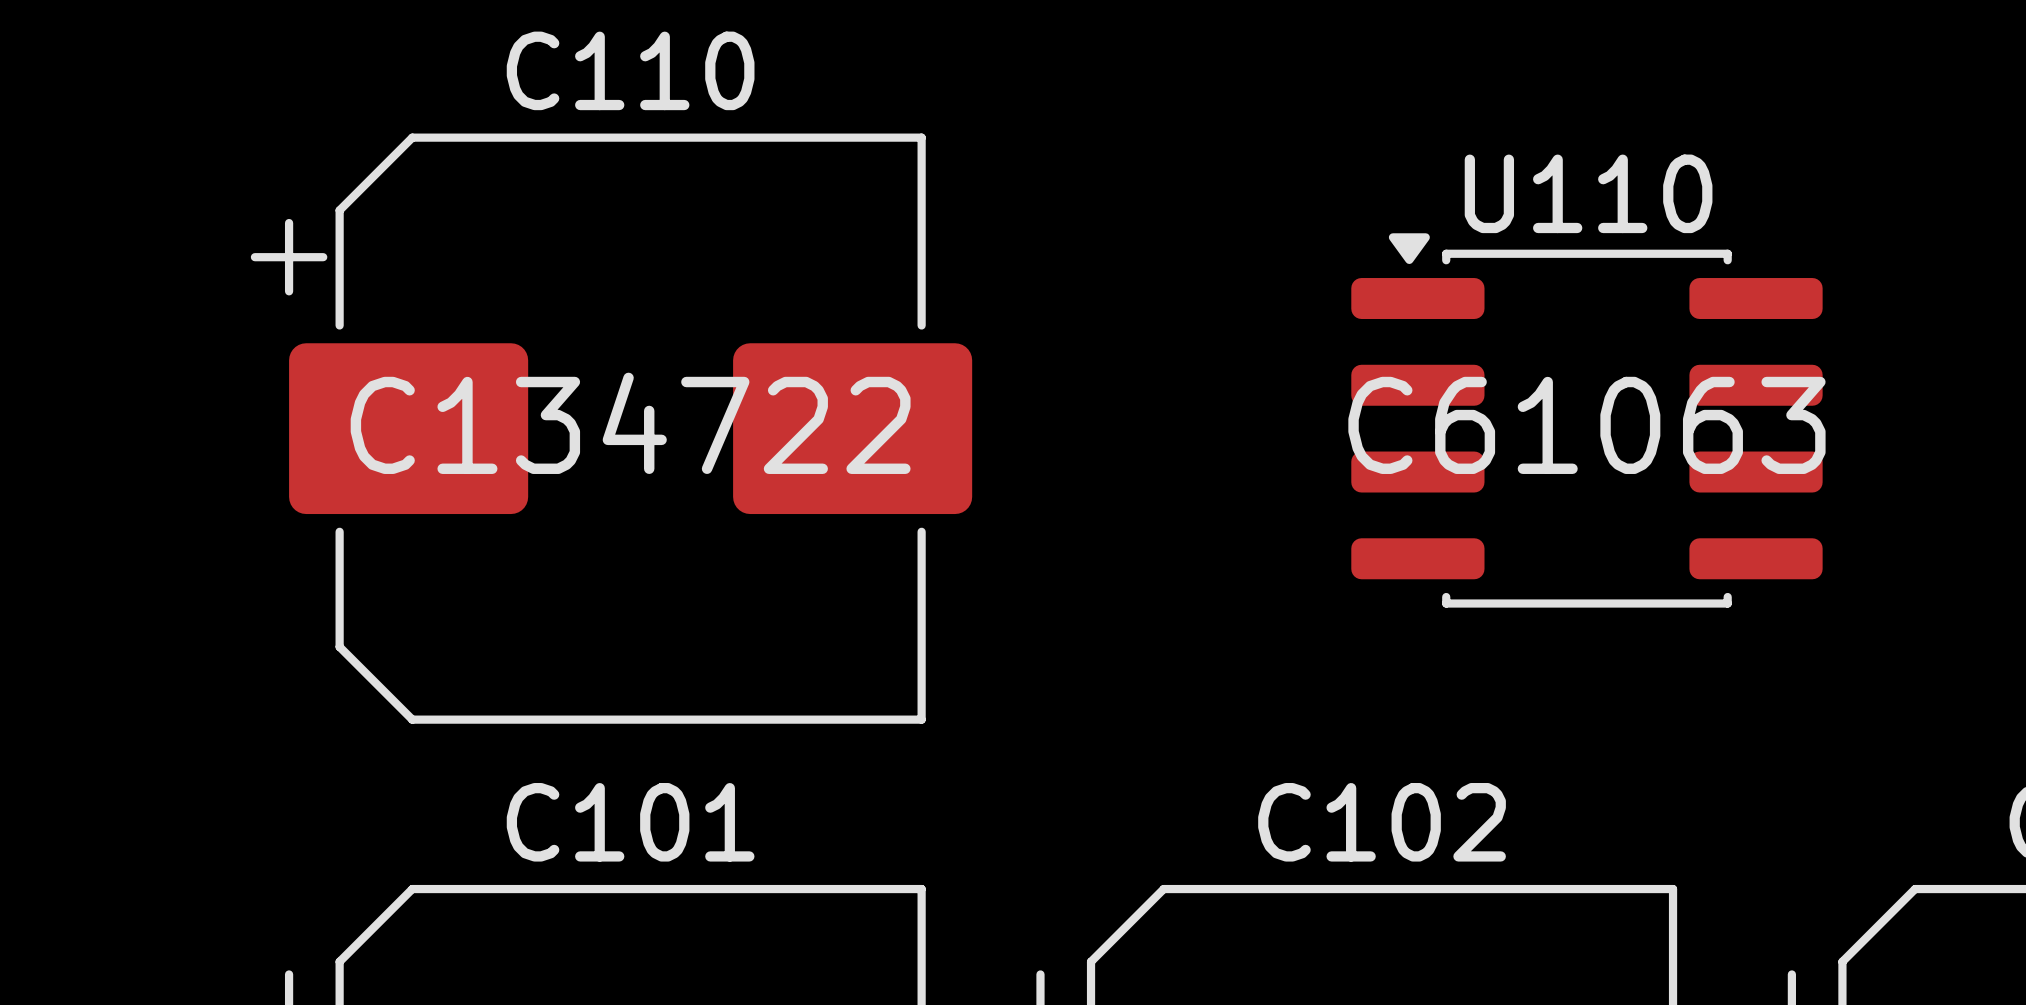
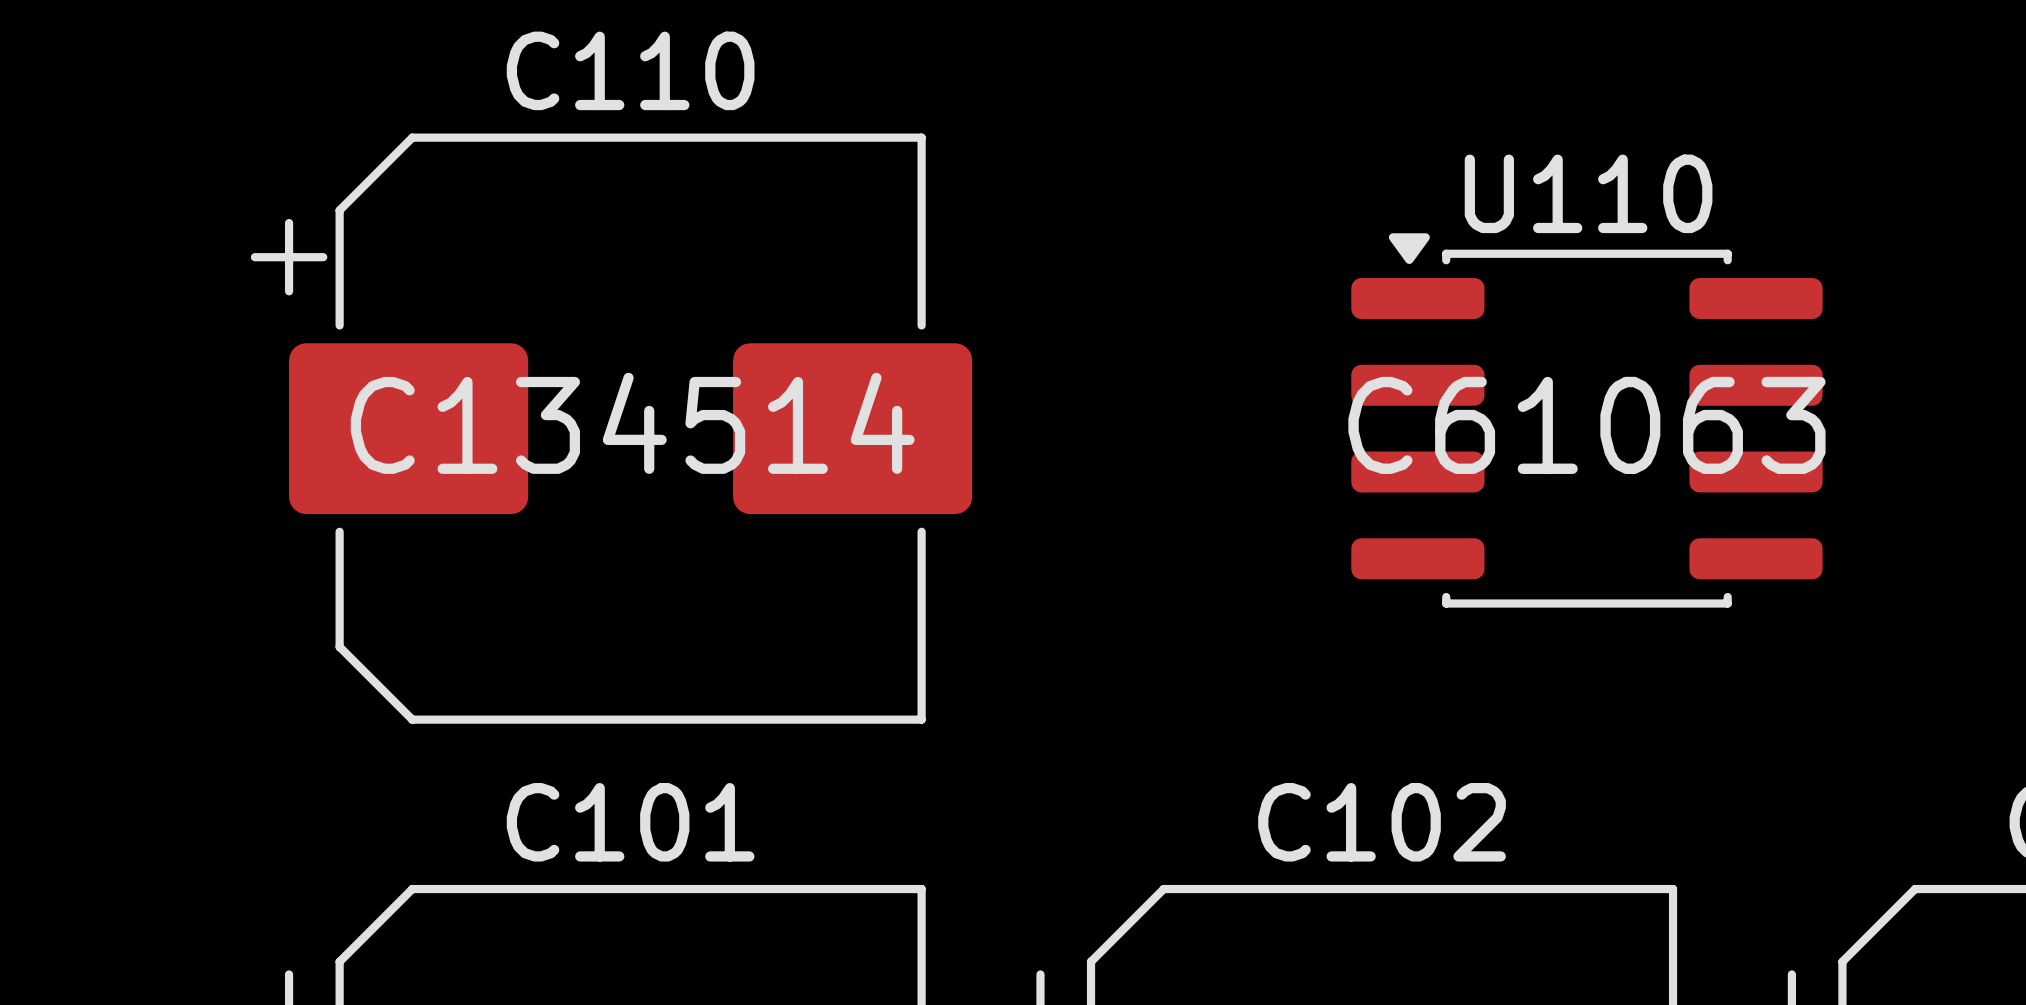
C110 text: C134722 (630, 423) -> C134514 (632, 423)

